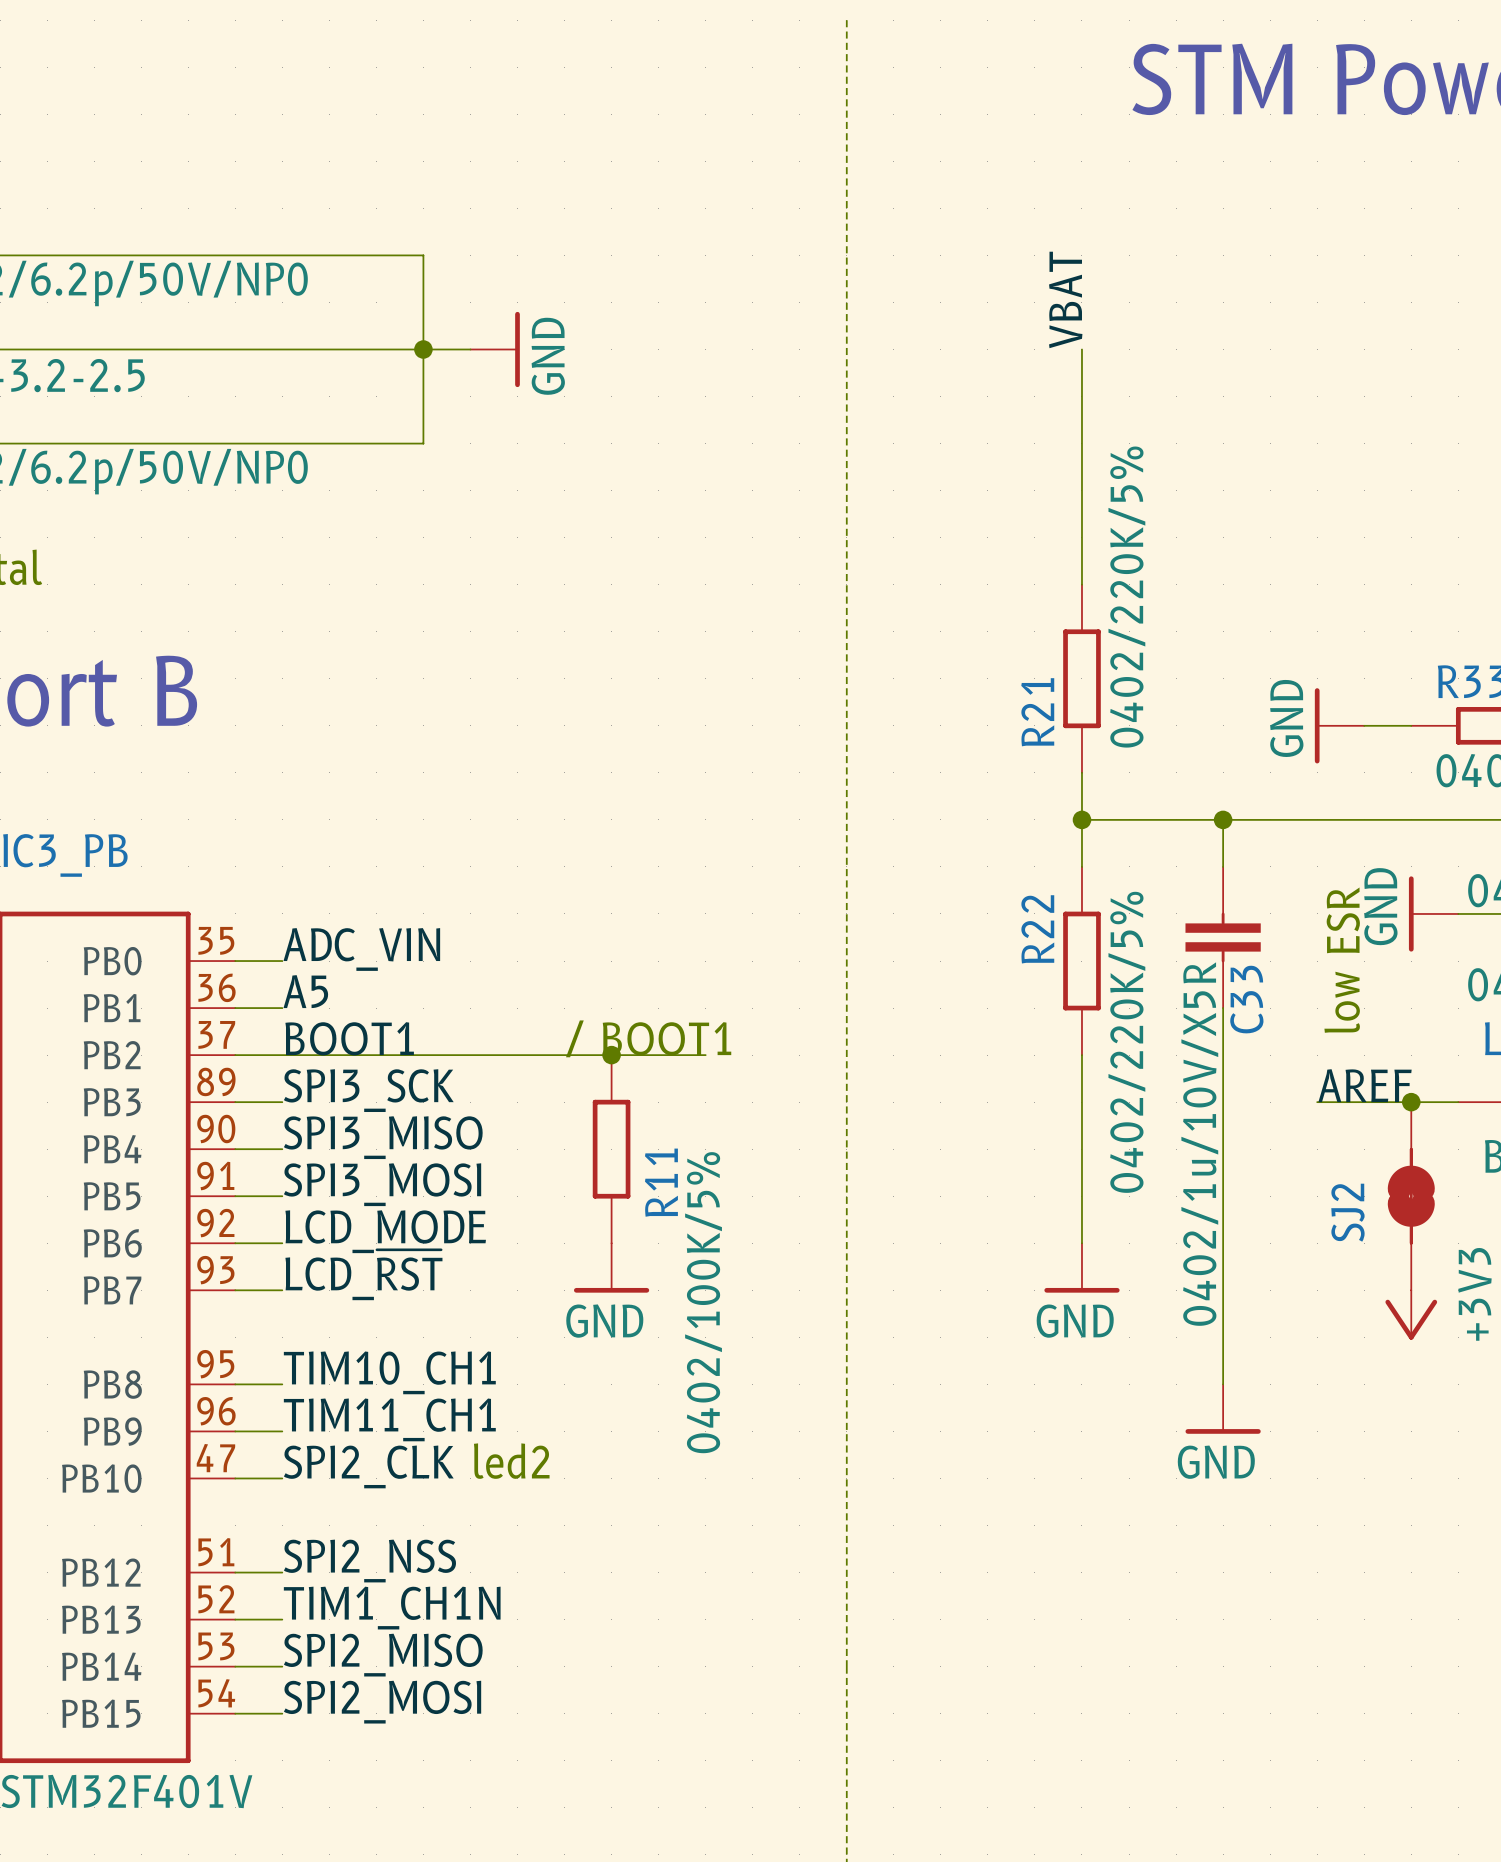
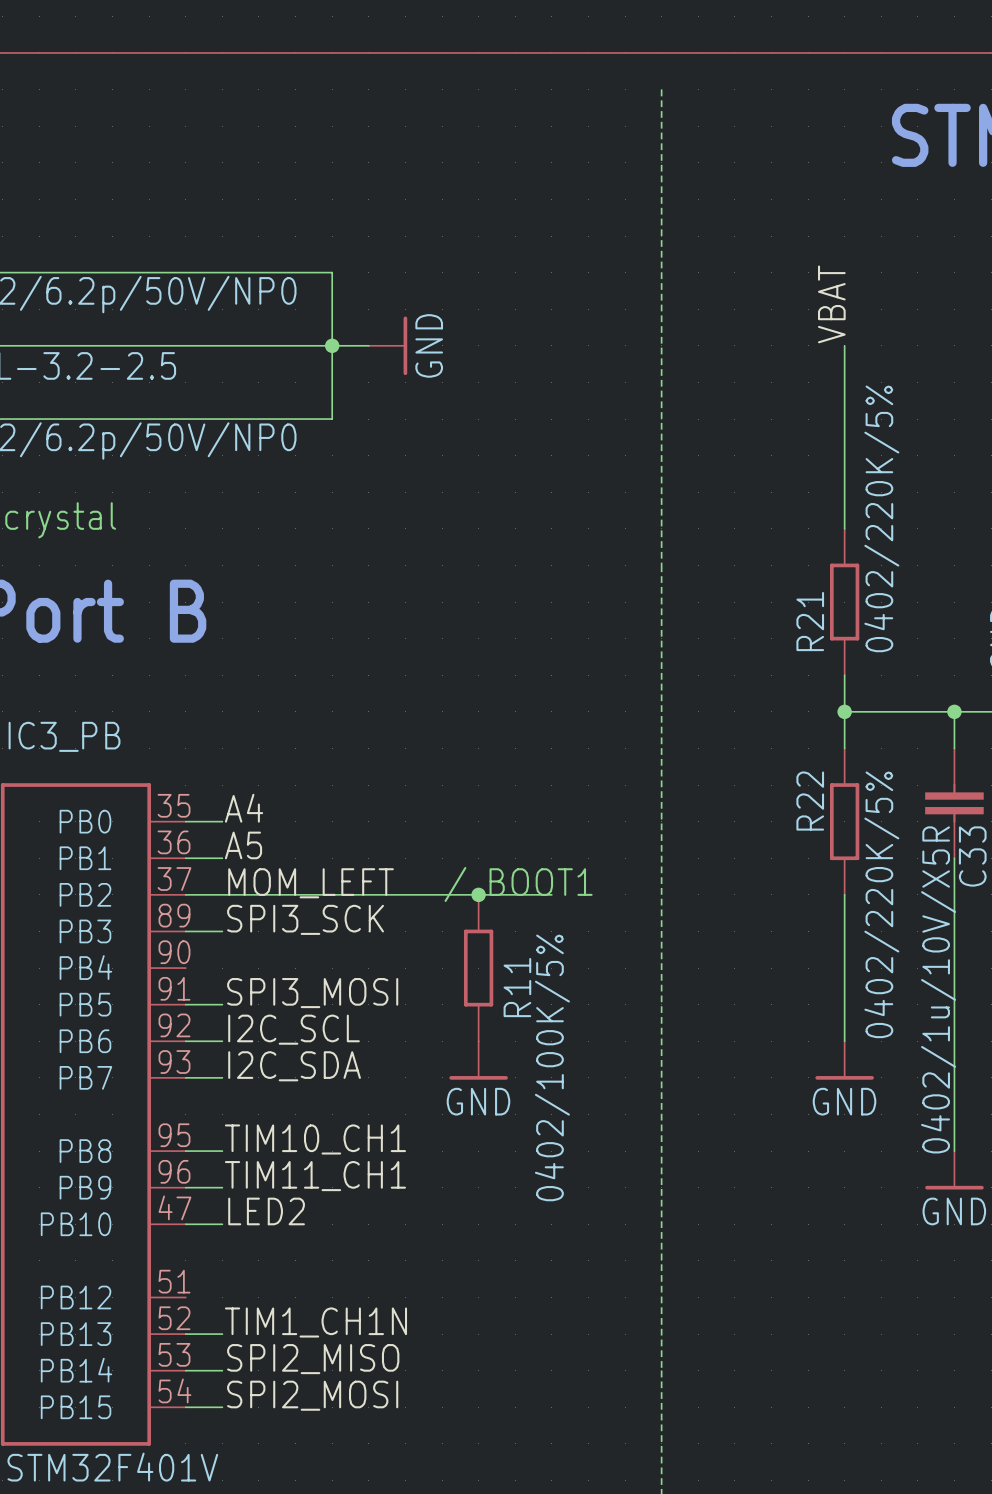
label: ADC_VIN (361, 949) -> A4 (244, 808)
label: BOOT1 (349, 1038) -> MOM_LEFT (311, 883)
label: SPI3_MISO (383, 1137) -> none
wire: (235, 1149) (282, 1149) -> none
label: LCD_MODE (385, 1231) -> I2C_SCL (294, 1029)
label: LCD_~{RST} (363, 1274) -> I2C_SDA (294, 1066)
text: led2 (511, 1461) -> none
label: SPI2_CLK (368, 1466) -> LED2 (266, 1211)
label: SPI2_NSS (369, 1561) -> none
wire: (235, 1572) (282, 1572) -> none

